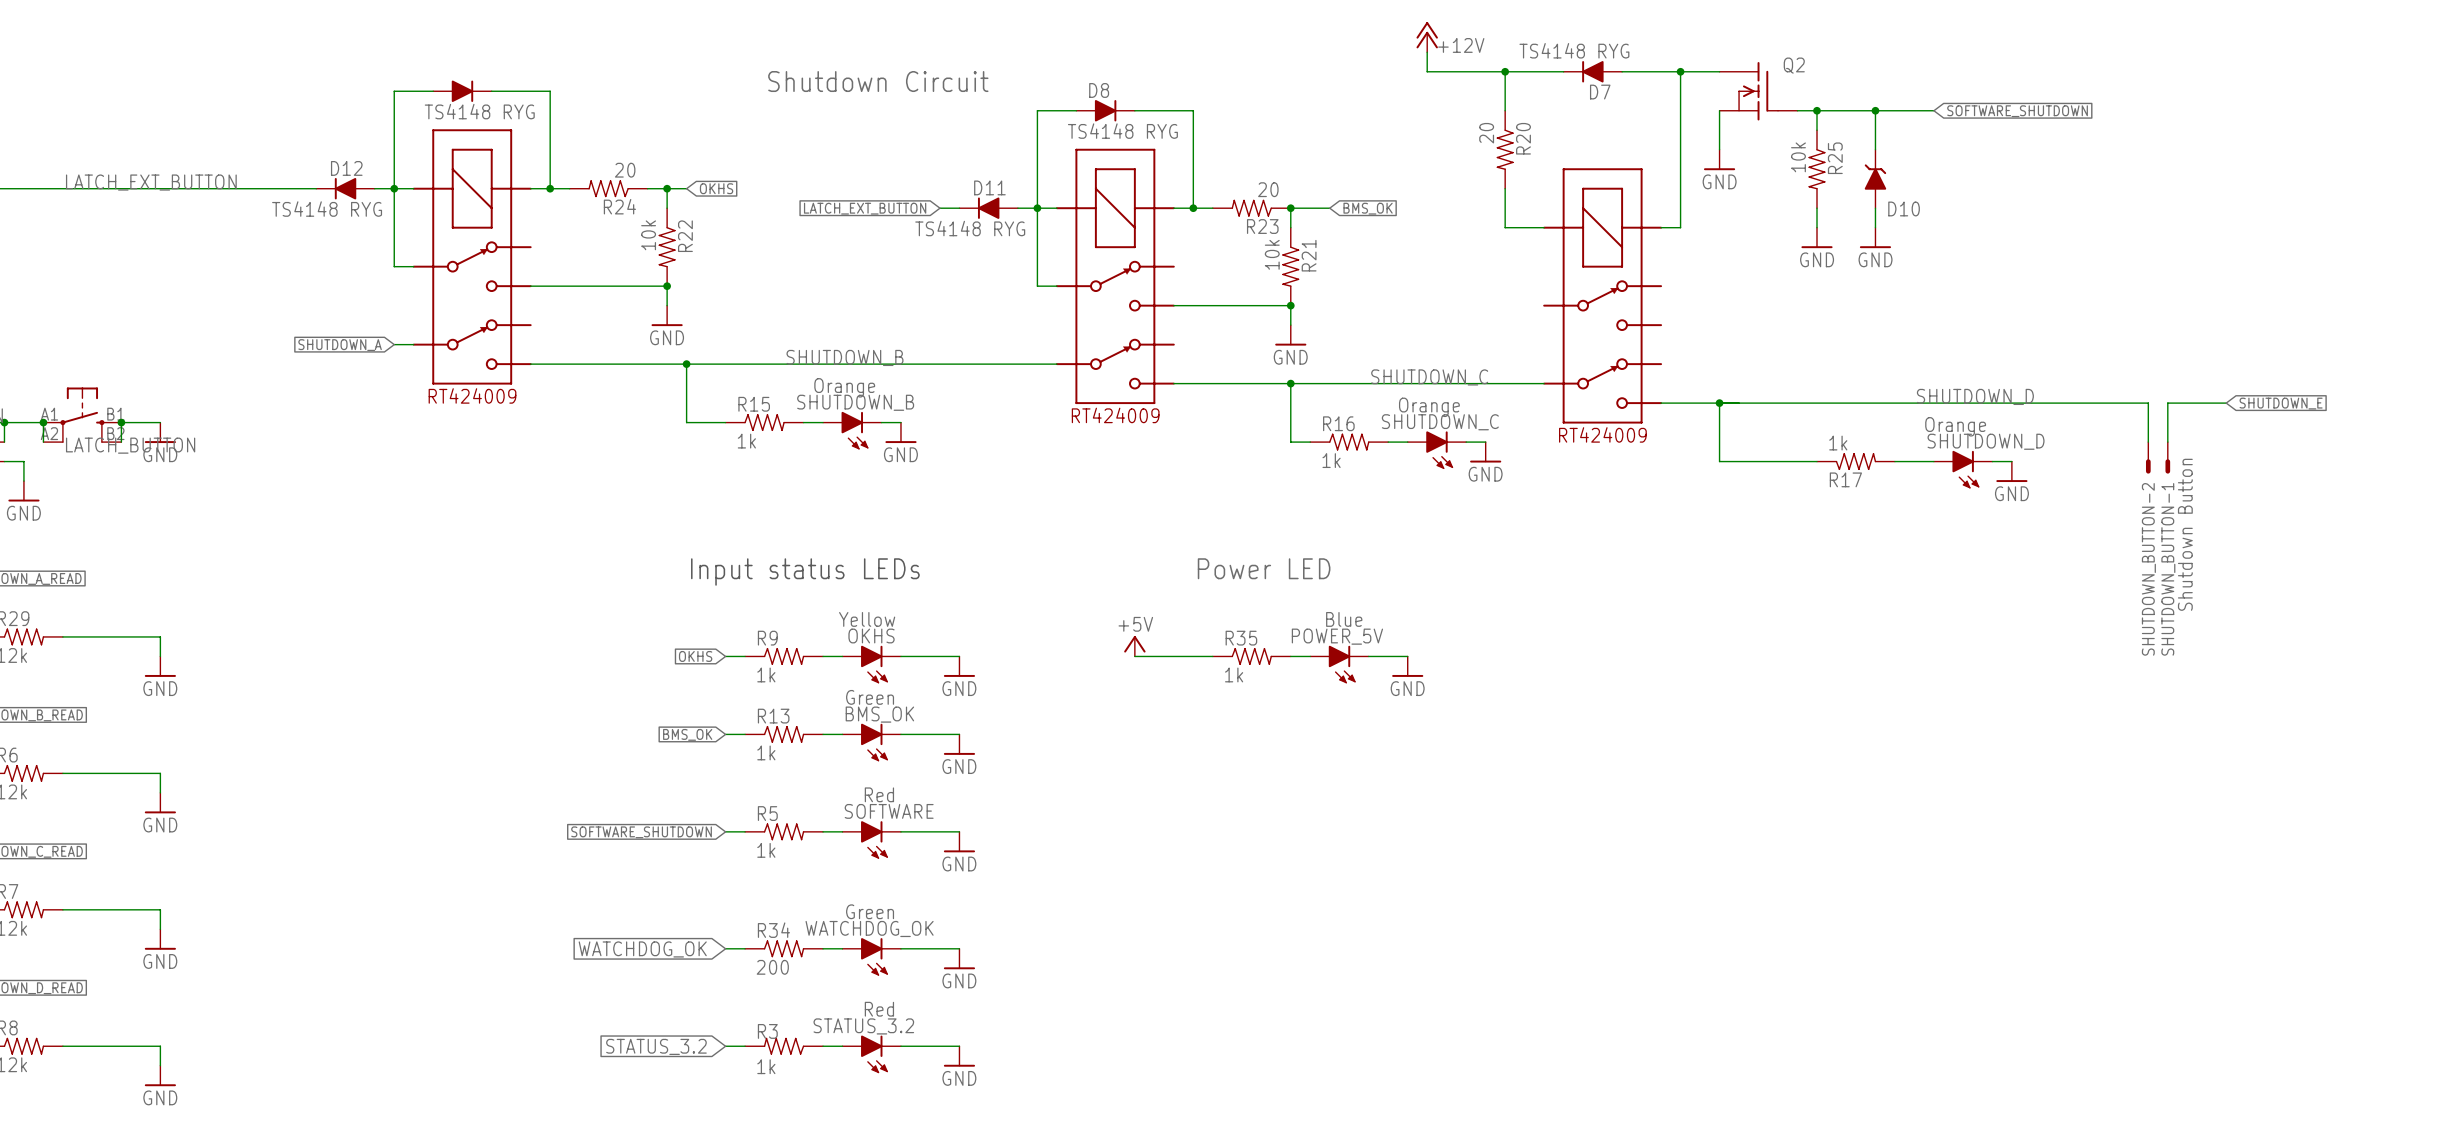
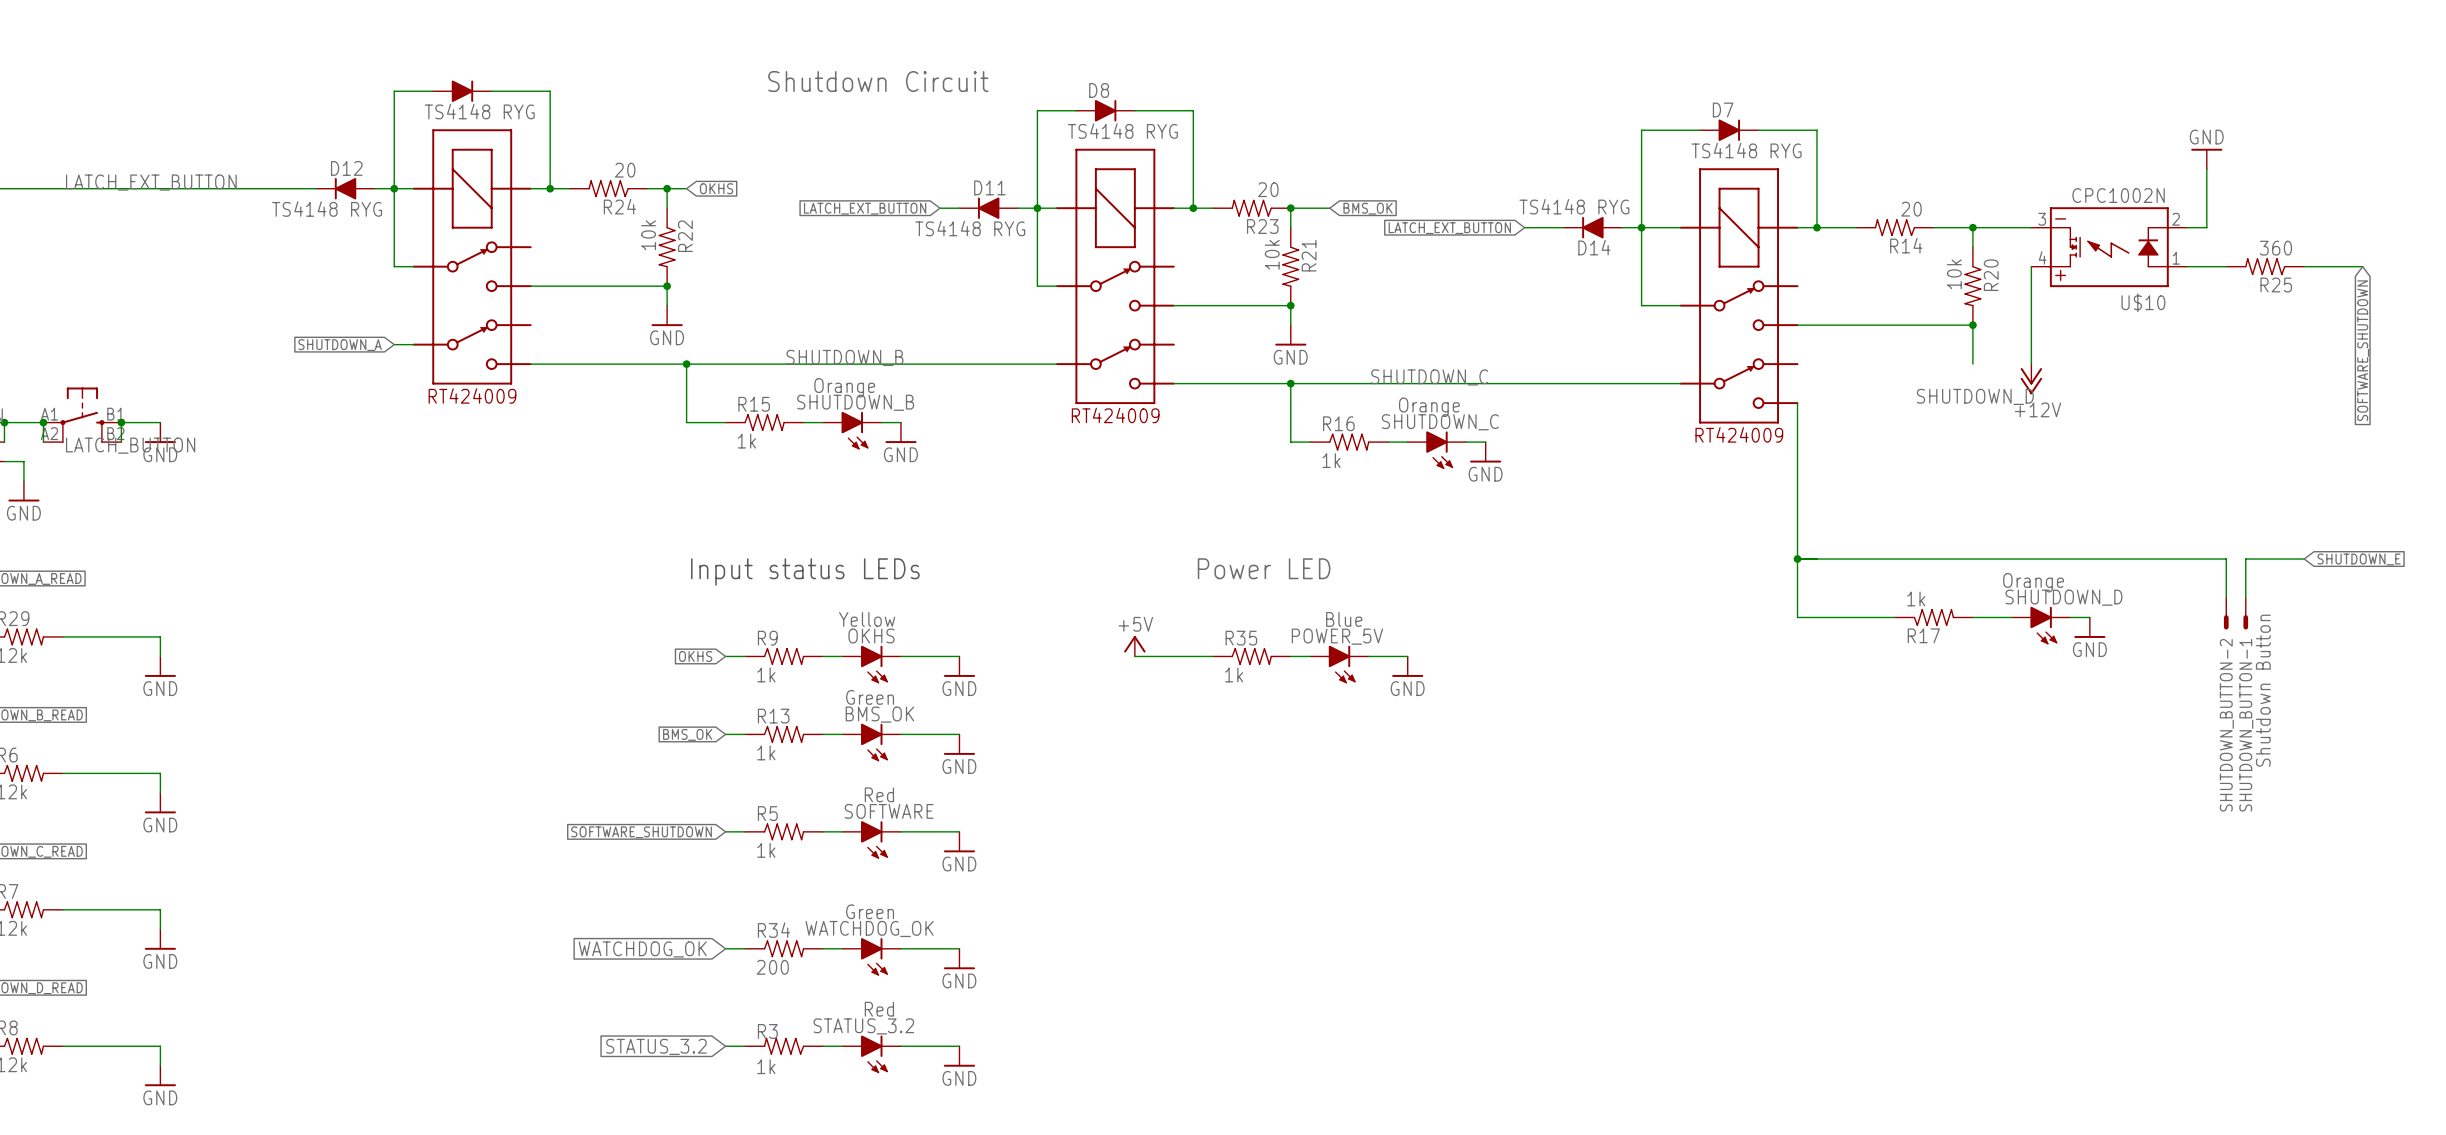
power symbol: +12V (1427, 37) -> none
wire: (1427, 52) (1427, 71) (1563, 71) -> none
wire: (1505, 71) (1505, 110) -> none
junction: (1505, 71) -> none
D7 rotation: 0° (1592, 71) -> 180° (1729, 130)
D7 position: (1592, 71) -> (1729, 130)
wire: (1622, 71) (1719, 71) -> none
wire: (1680, 71) (1680, 227) -> none
junction: (1680, 71) -> none
Q2: (1758, 91) -> none
wire: (1797, 110) (1933, 110) -> none
wire: (1817, 110) (1817, 130) -> none
junction: (1817, 110) -> none
wire: (1875, 110) (1875, 149) -> none
junction: (1875, 110) -> none
global label: SOFTWARE_SHUTDOWN (2017, 111) -> none
wire: none -> (1700, 130) (1641, 130) (1641, 305) (1680, 305)
wire: none -> (1758, 130) (1817, 130) (1817, 208)
R20 value: 20 (1486, 133) -> 10k (1954, 274)
R20 position: (1505, 149) -> (1972, 286)
R25 value: 10k (1798, 157) -> 360 (2275, 248)
power symbol: none -> GND (2206, 158)
power symbol: GND (1719, 159) -> none
R25 rotation: 0° (1817, 169) -> 90° clockwise (2265, 266)
R25 position: (1817, 169) -> (2265, 266)
wire: none -> (2206, 169) (2206, 227) (2187, 227)
D10: (1875, 178) -> none
wire: (1505, 188) (1505, 227) (1524, 227) -> none
wire: (1875, 208) (1875, 227) -> (1972, 227) (1972, 247)
D14: none -> TS4148 RYG (1592, 227)
junction: none -> (1641, 227)
wire: none -> (1797, 227) (1855, 227)
junction: none -> (1817, 227)
R14: none -> 20 (1894, 227)
wire: none -> (1933, 227) (2031, 227)
junction: none -> (1972, 227)
global label: none -> LATCH_EXT_BUTTON (1449, 228)
power symbol: GND (1817, 237) -> none
power symbol: GND (1875, 237) -> none
U$10: none -> CPC1002N (2109, 247)
wire: none -> (2031, 266) (2031, 364)
wire: none -> (2187, 266) (2226, 266)
wire: none -> (2304, 266) (2362, 266)
part position: (1602, 295) -> (1739, 295)
wire: none -> (1797, 325) (1972, 325) (1972, 364)
junction: none -> (1972, 325)
global label: none -> SOFTWARE_SHUTDOWN (2363, 350)
power symbol: none -> +12V (2031, 379)
wire: none -> (1544, 383) (1680, 383)
wire: (1661, 403) (2148, 403) (2148, 442) -> none
wire: (1719, 403) (1719, 461) (1817, 461) -> none
junction: (1719, 403) -> none
wire: none -> (1797, 403) (1797, 617) (1894, 617)
wire: (2226, 403) (2167, 403) (2167, 442) -> (2304, 559) (2245, 559) (2245, 597)
global label position: SHUTDOWN_E (2281, 403) -> SHUTDOWN_E (2359, 559)
SHUTDOWN_BUTTON-2 position: (2148, 457) -> (2226, 613)
SHUTDOWN_BUTTON-1 position: (2167, 457) -> (2245, 613)
R17 position: (1855, 461) -> (1933, 617)
wire: (1894, 461) (1933, 461) -> (1972, 617) (2011, 617)
wire: (1992, 461) (2011, 461) -> (2070, 617) (2089, 617)
SHUTDOWN_D position: (1963, 469) -> (2041, 625)
power symbol position: GND (2011, 471) -> GND (2089, 627)
wire: none -> (1797, 559) (2226, 559) (2226, 597)
junction: none -> (1797, 559)

